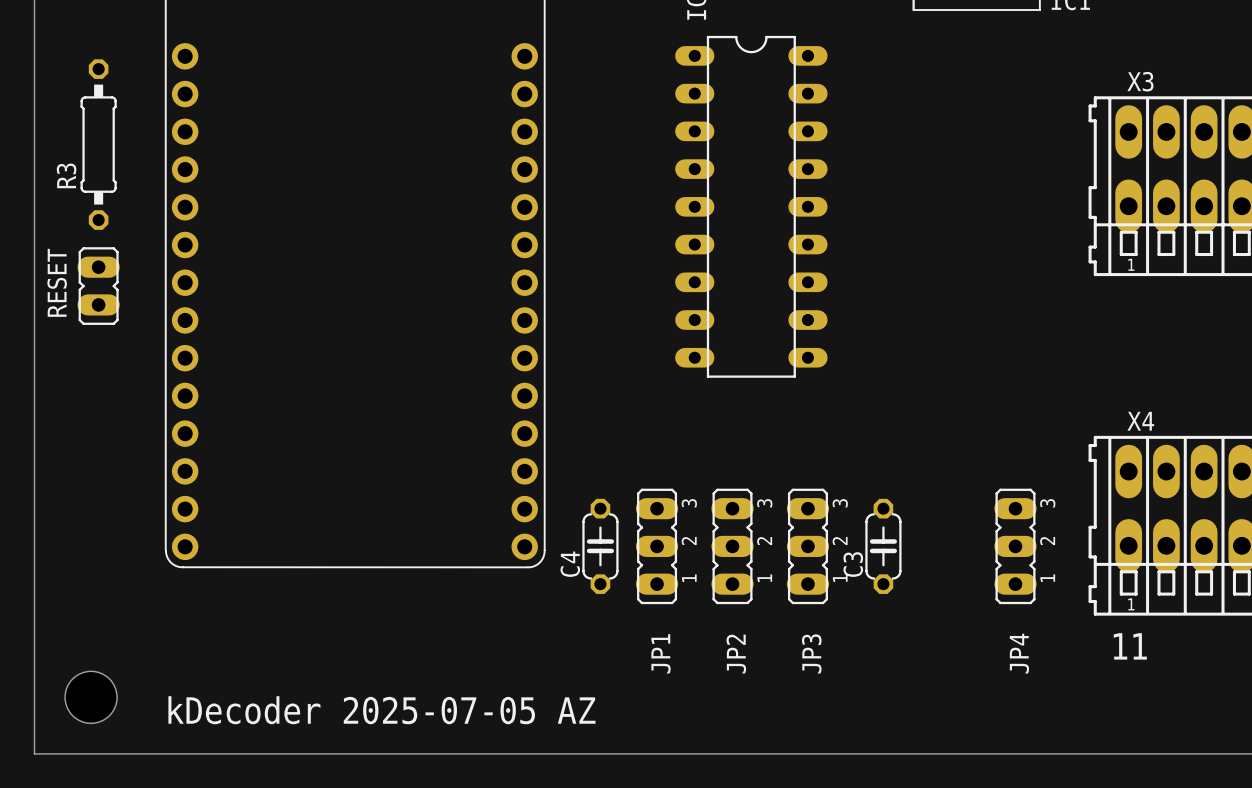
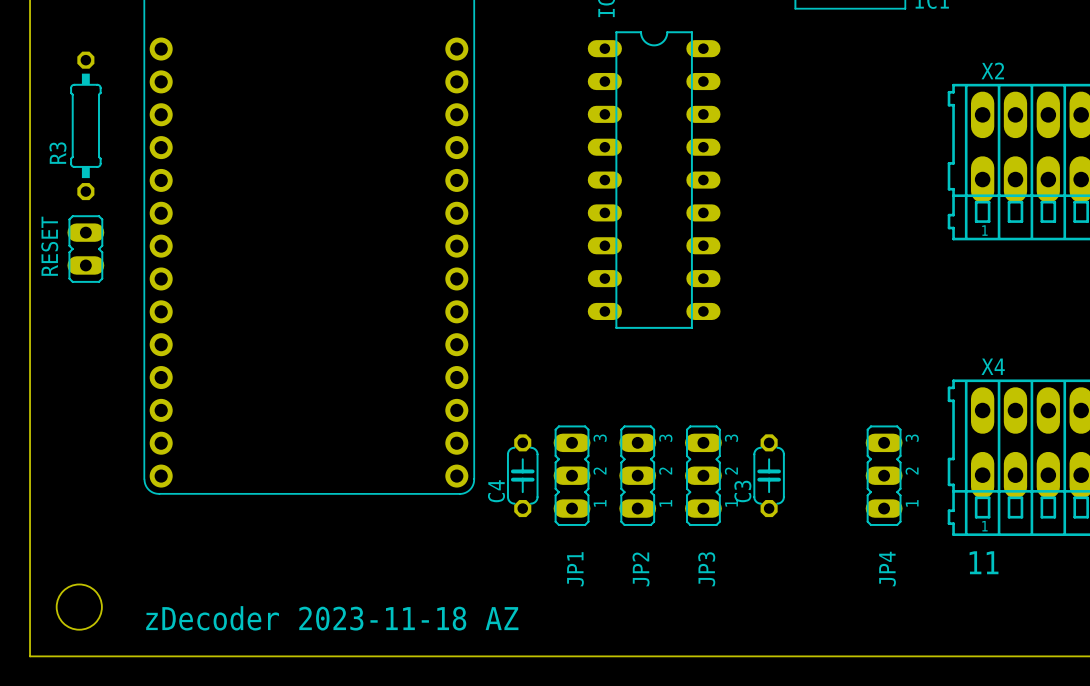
X3 name: X3 (1140, 81) -> X2 (992, 70)
text: kDecoder 2025-07-05 AZ (381, 710) -> zDecoder 2023-11-18 AZ (332, 618)

